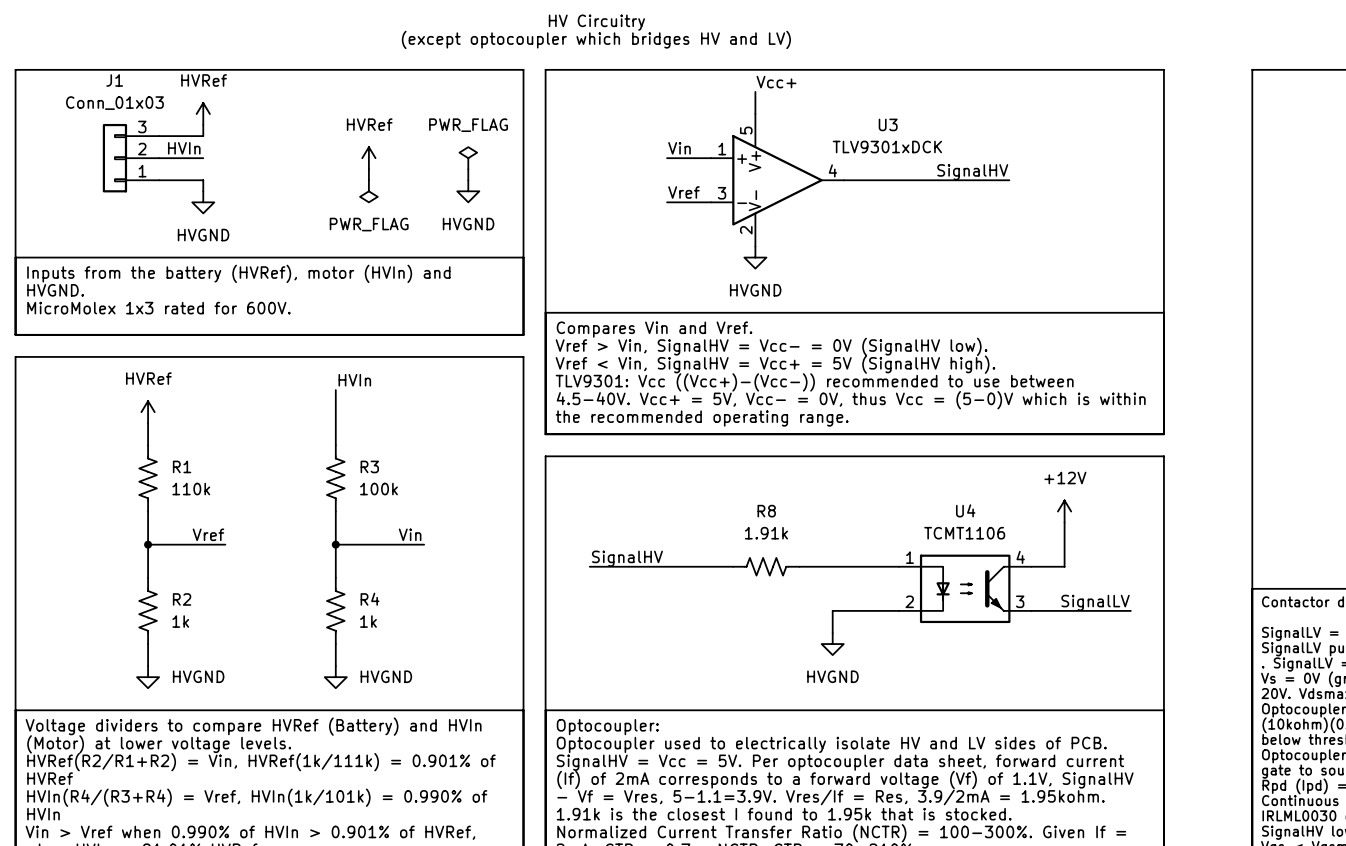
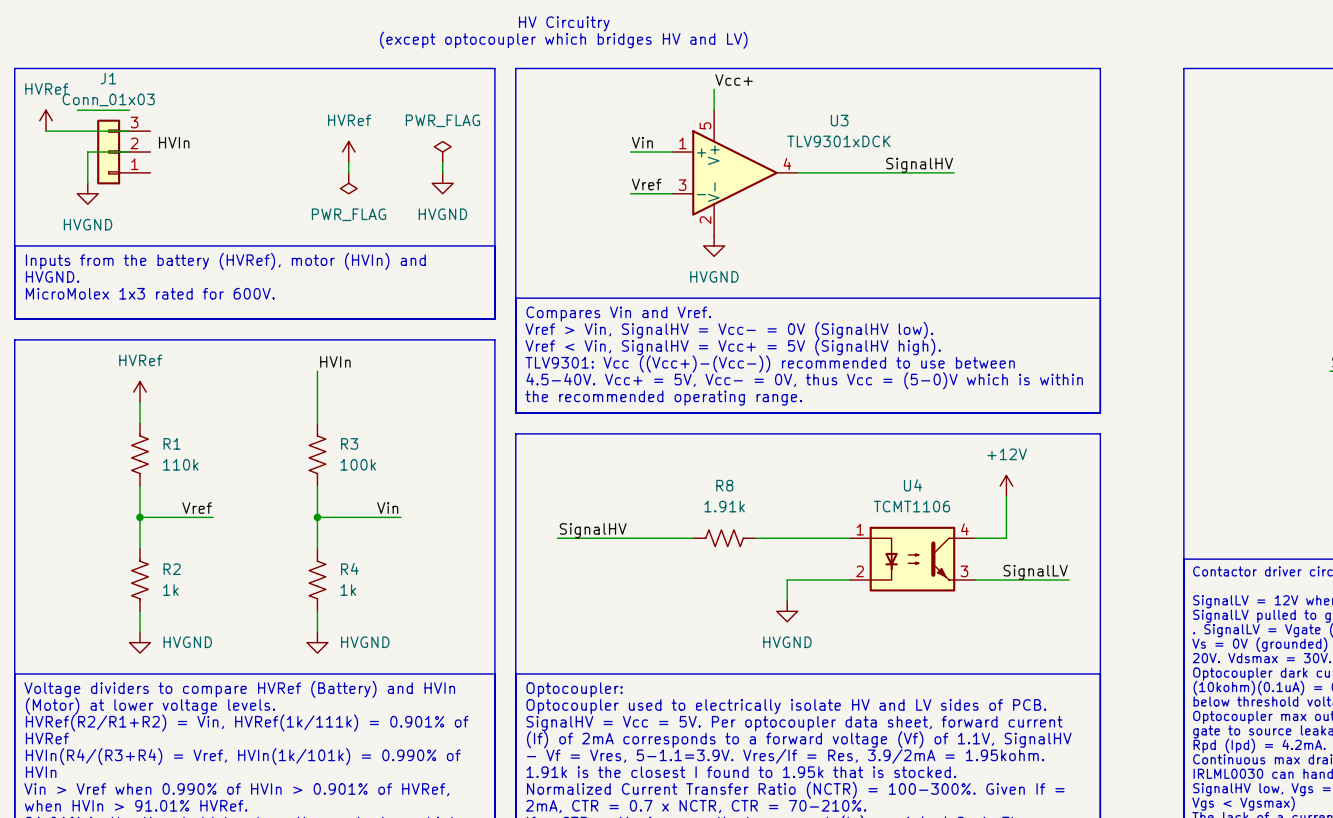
wire: none -> (77, 110) (129, 110)
power symbol position: HVRef (203, 114) -> HVRef (46, 120)
wire: (203, 125) (203, 136) (159, 136) -> none
wire: none -> (46, 131) (129, 131)
wire: none -> (129, 152) (87, 152) (87, 183)
wire: (159, 158) (203, 158) -> none
wire: (159, 180) (203, 180) (203, 191) -> none
power symbol position: HVGND (203, 202) -> HVGND (87, 193)

